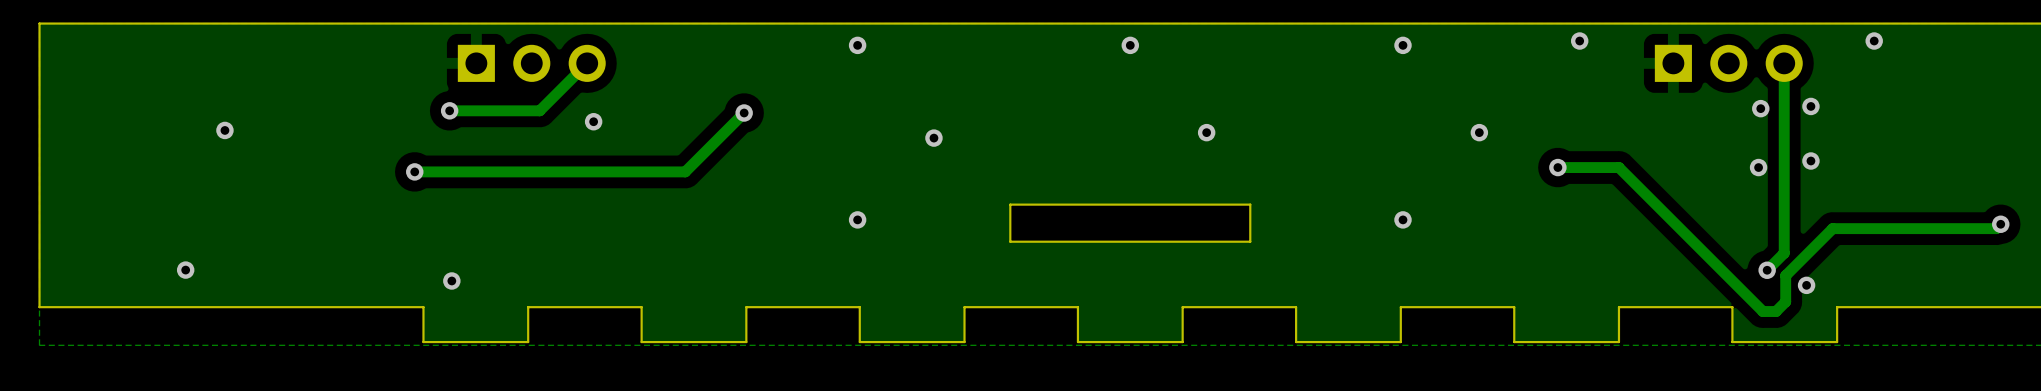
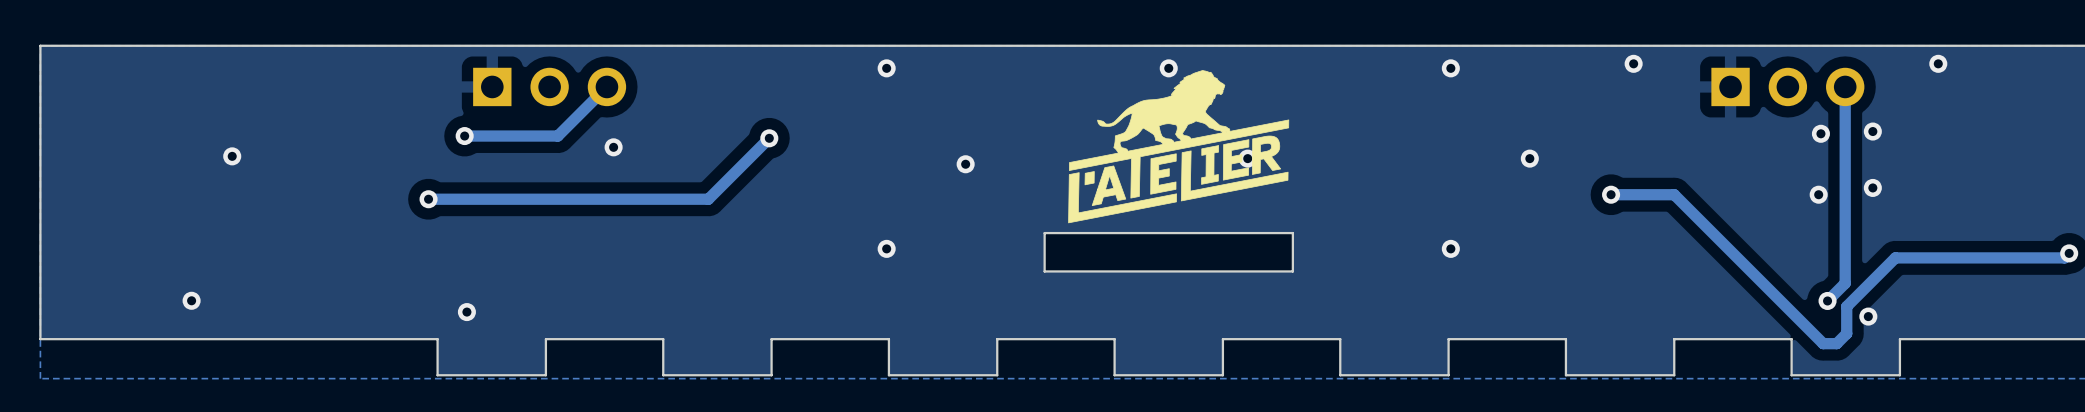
drawing: none -> [1068, 70, 1290, 224]

